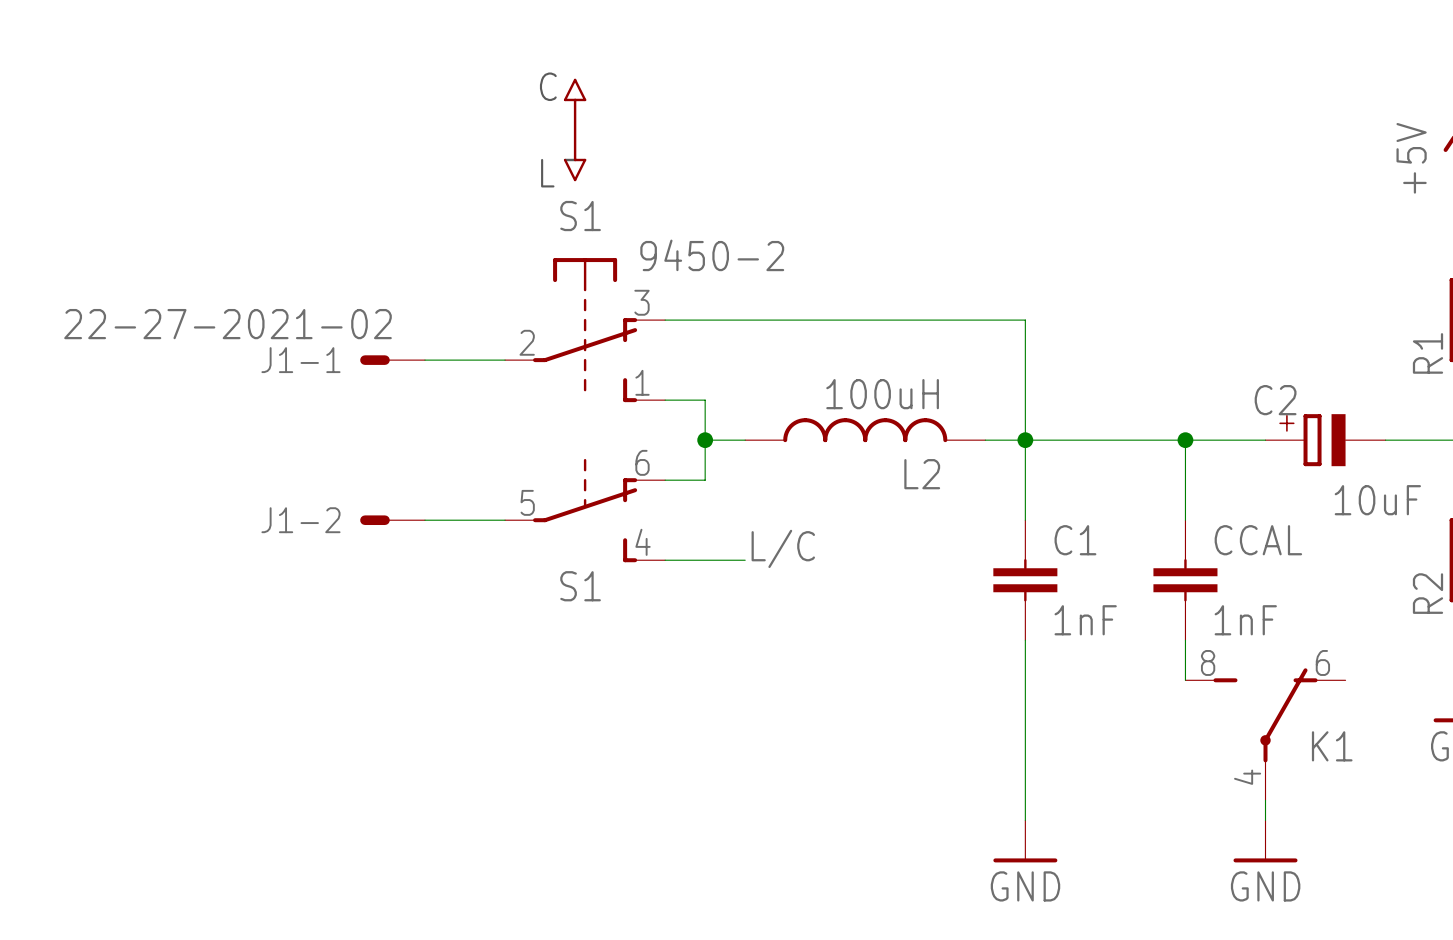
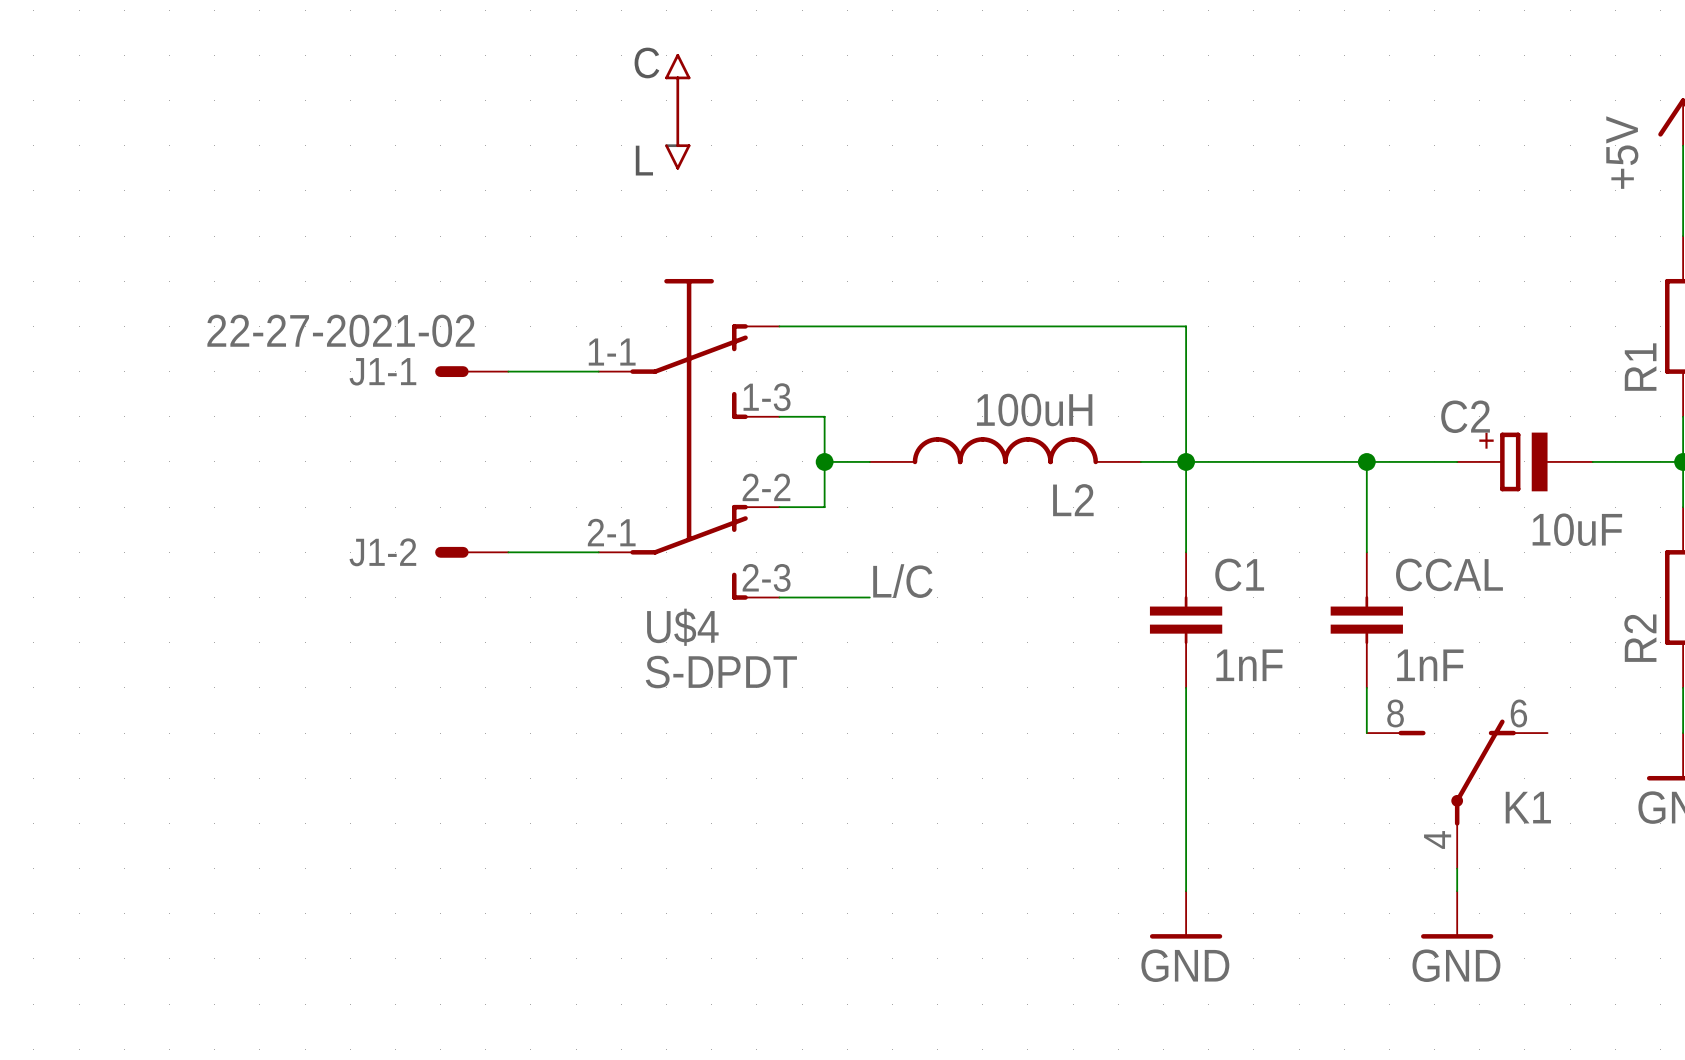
S1: 9450-2 (585, 330) -> none
U$4: none -> S-DPDT (689, 439)
S1: (585, 510) -> none

